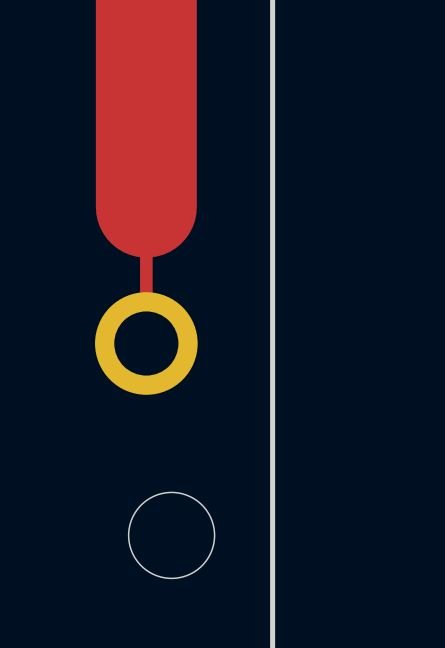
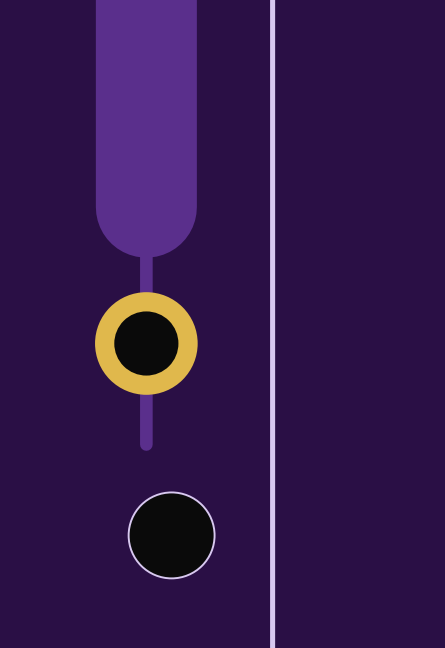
track: none -> (146, 343) (146, 444)

